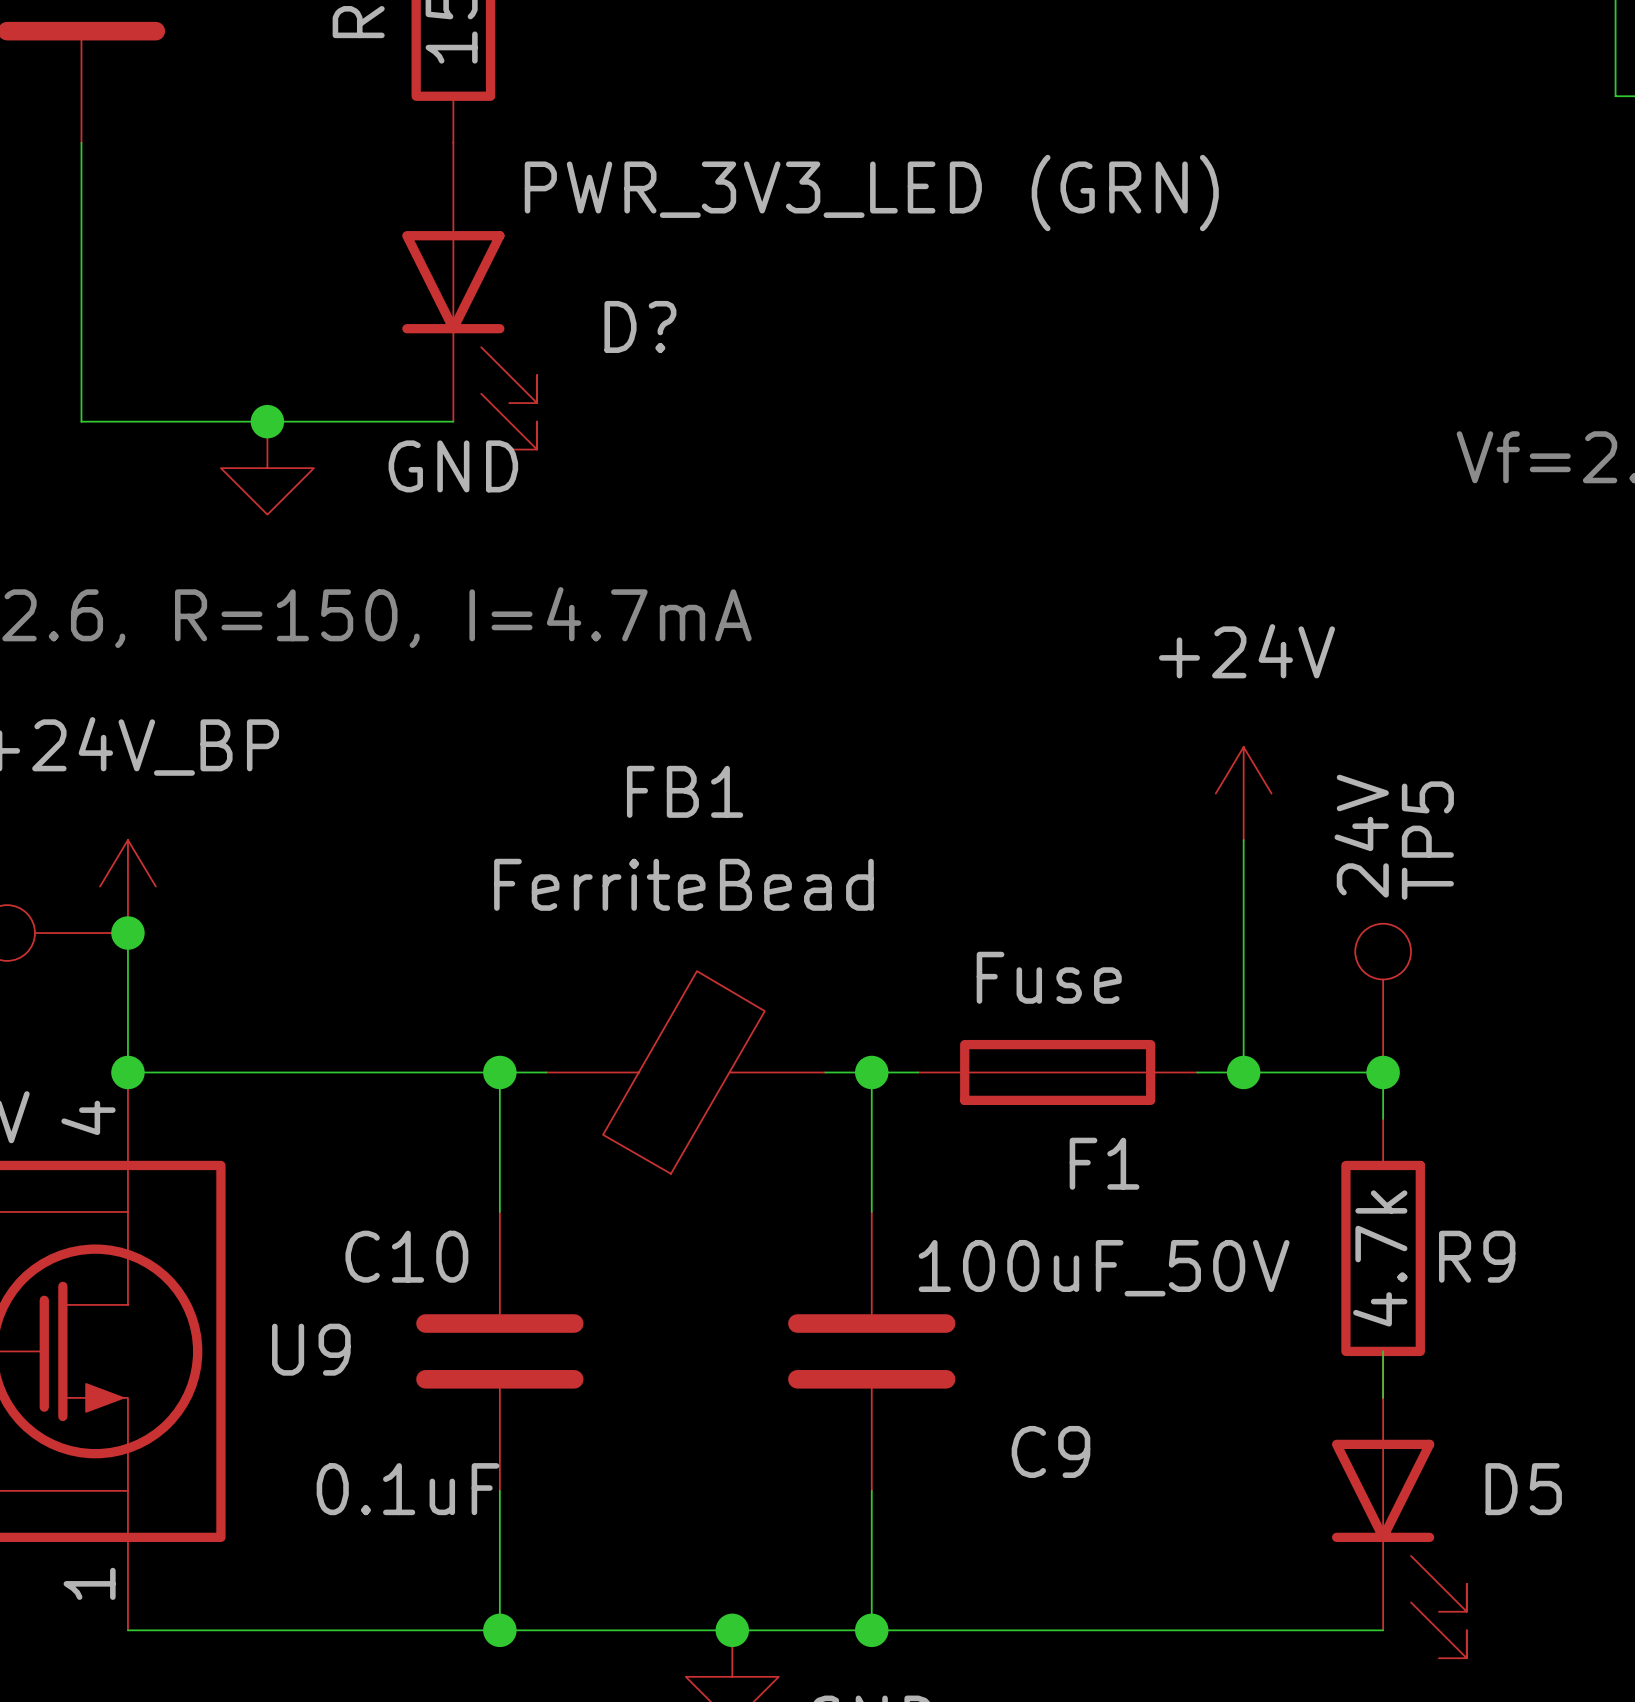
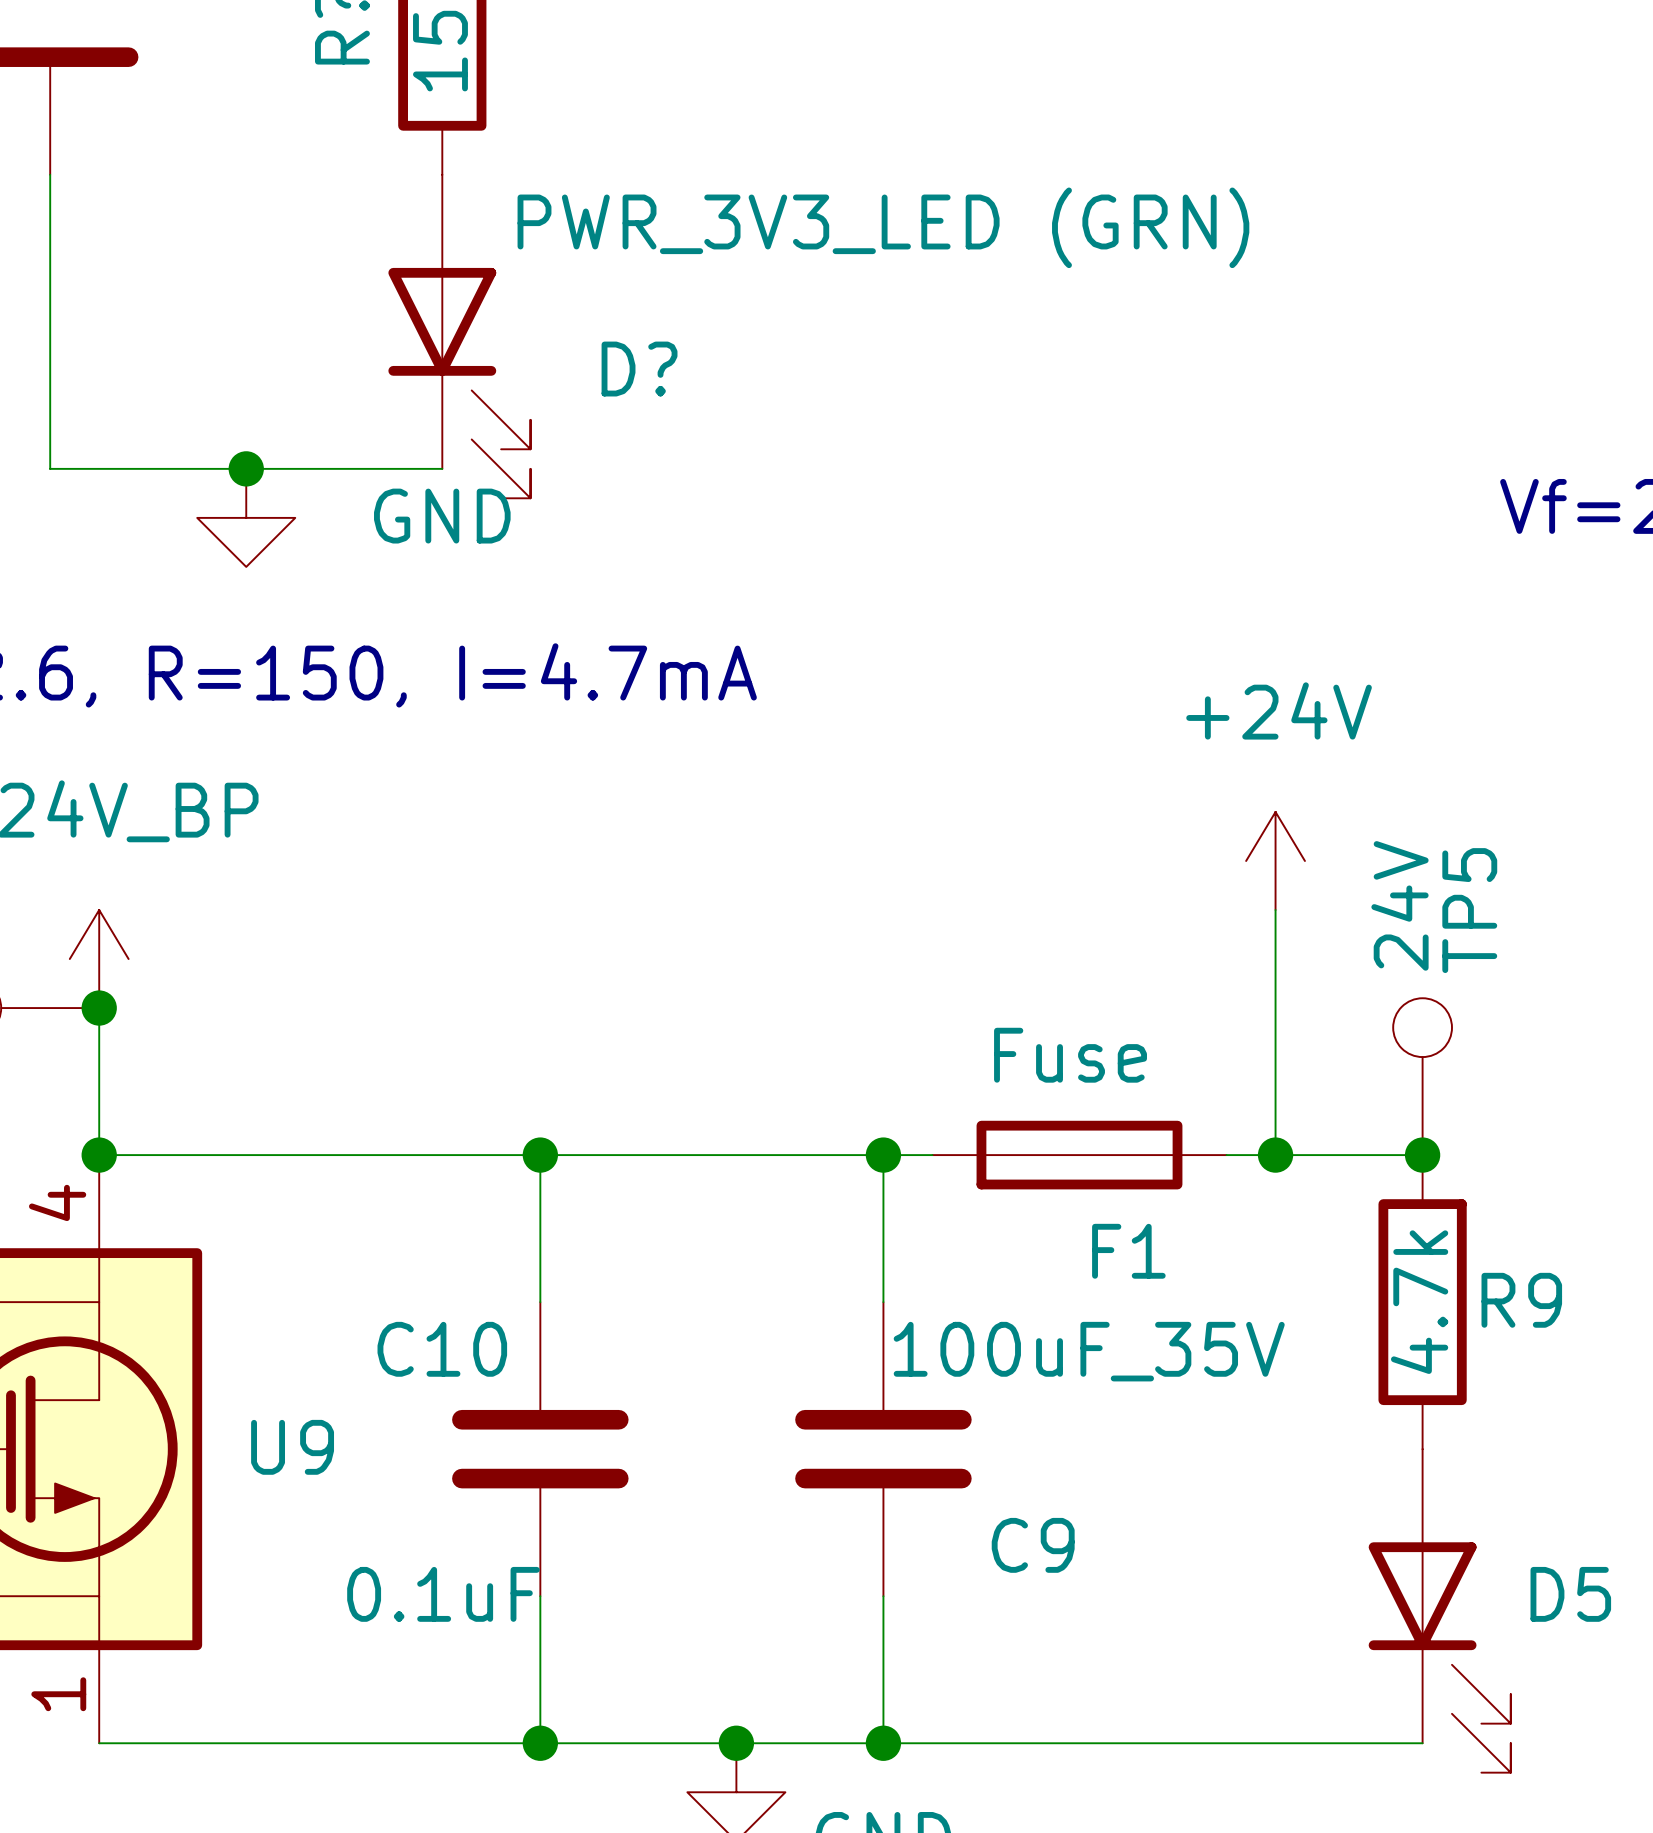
wire: (499, 1072) (499, 1211) -> none
junction position: (499, 1072) -> (540, 1155)
FB1: FerriteBead (685, 1072) -> none
wire: none -> (834, 1155) (540, 1155) (540, 1302)
R9 position: (1383, 1258) -> (1422, 1302)
C9 value: 100uF_50V (1104, 1268) -> 100uF_35V (1089, 1351)
C10 position: (499, 1351) -> (540, 1449)
C9 name position: C9 (1050, 1451) -> C9 (1033, 1545)
wire: (499, 1490) (499, 1630) -> (540, 1596) (540, 1743)
junction position: (499, 1630) -> (540, 1743)

